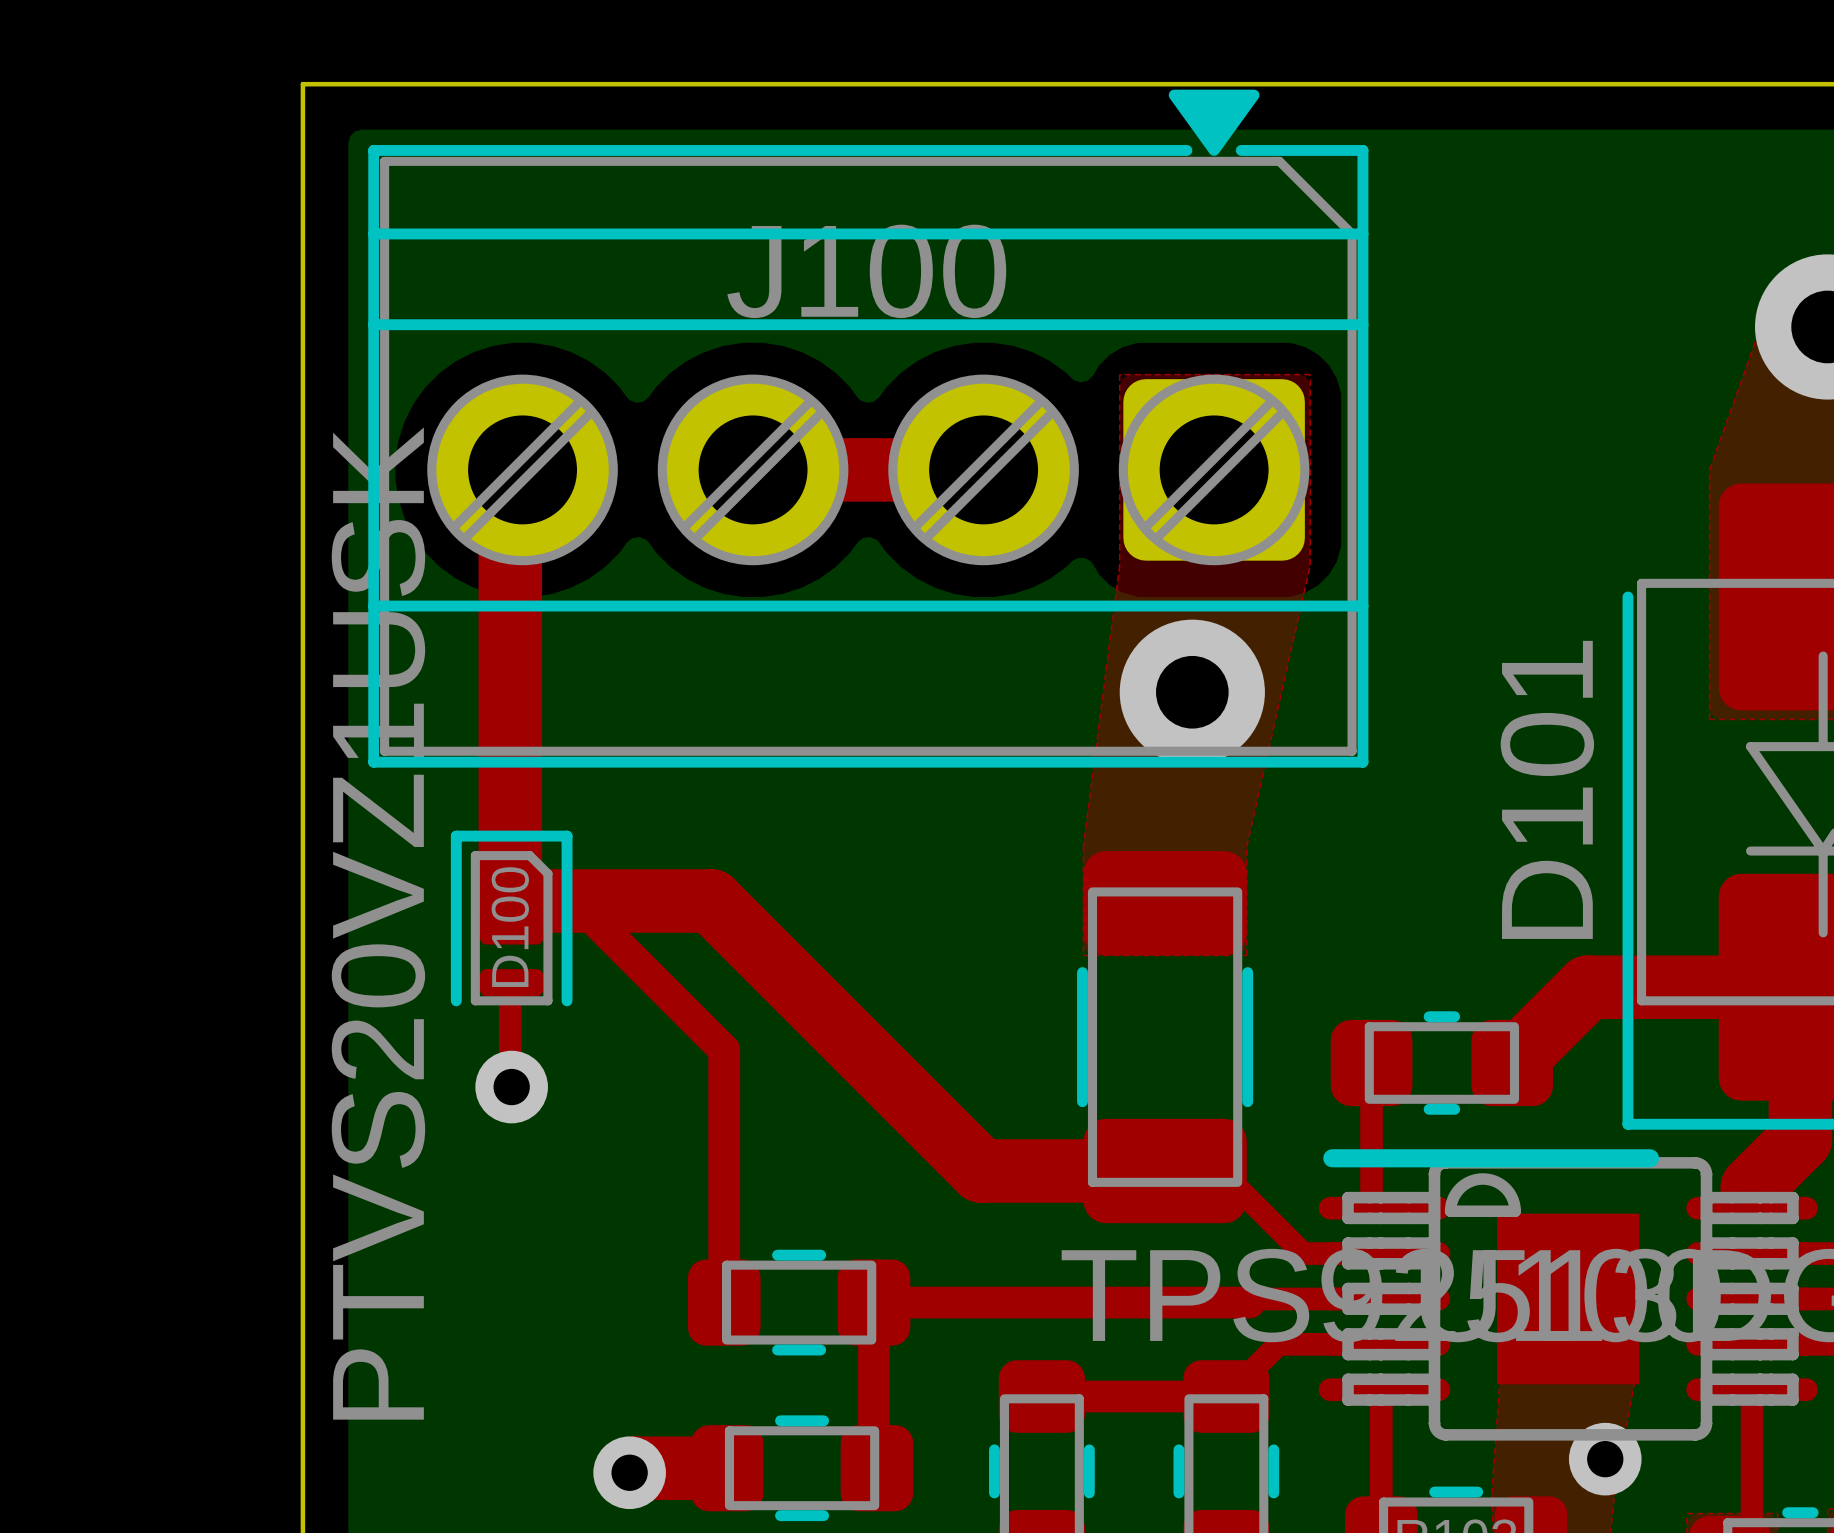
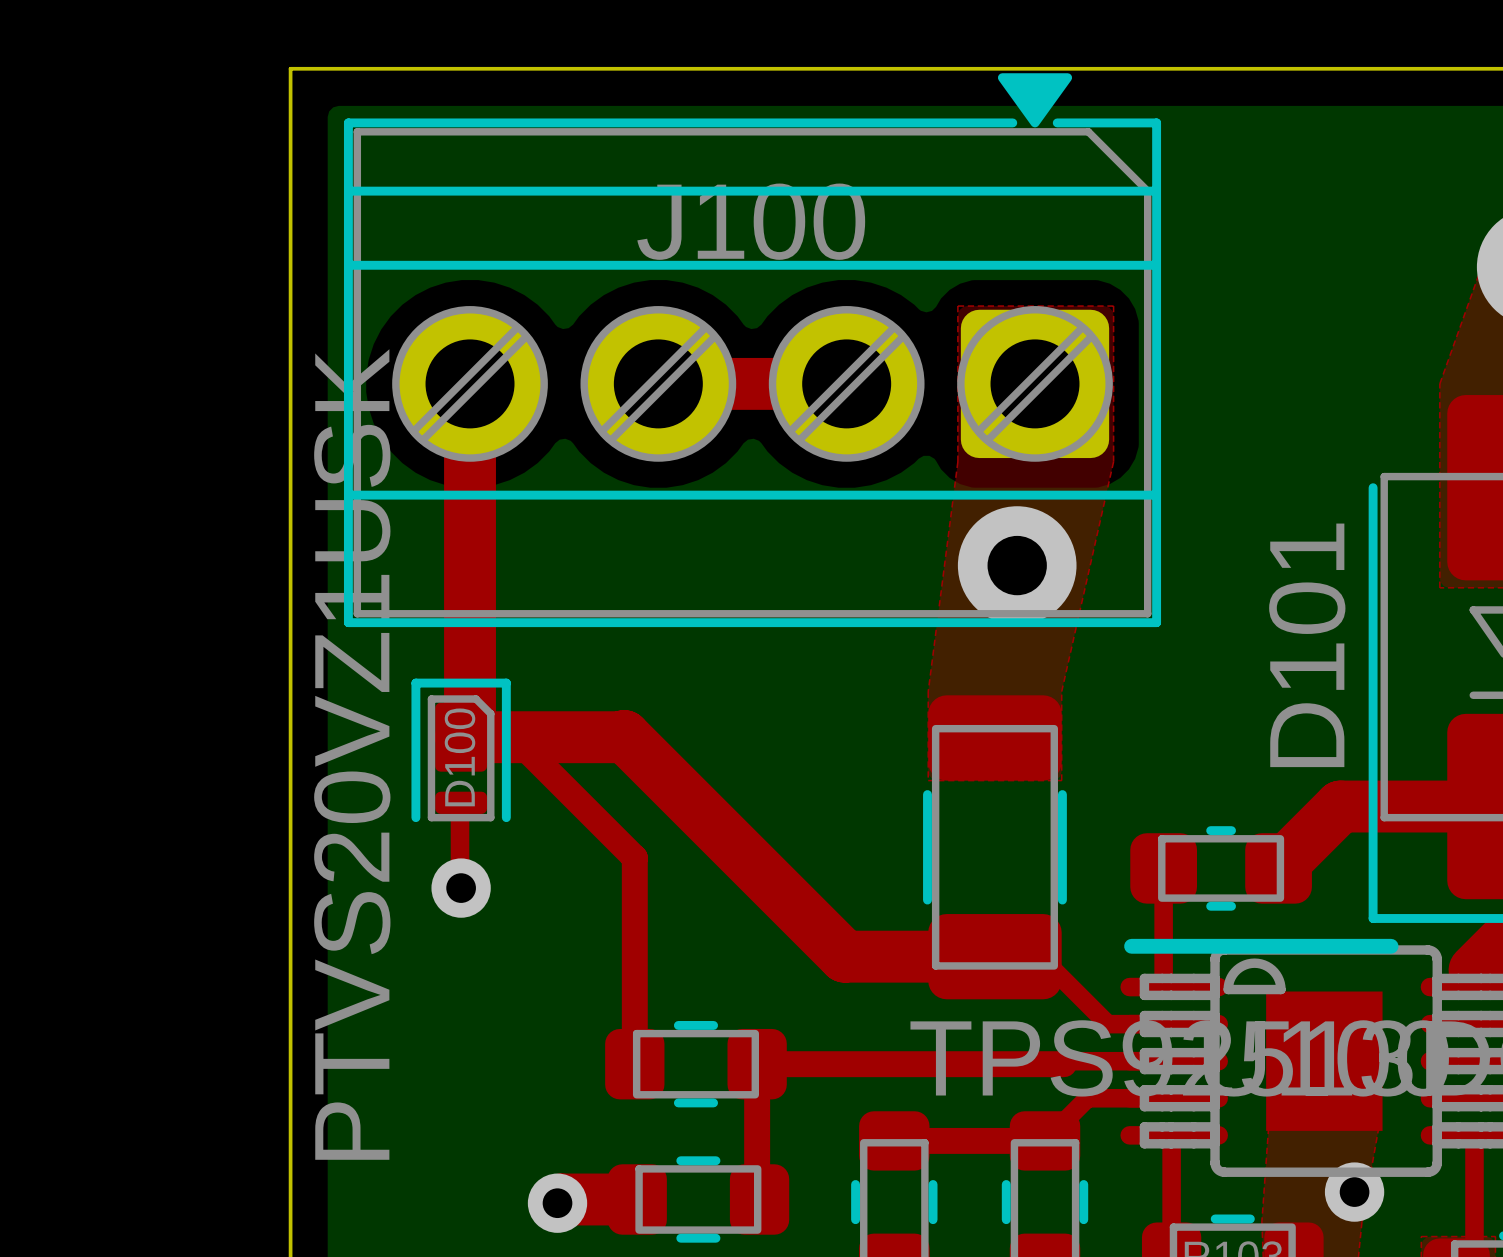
top track: (510, 482) (510, 901) (711, 901) -> (470, 383) (470, 728) (461, 737) (624, 736)

